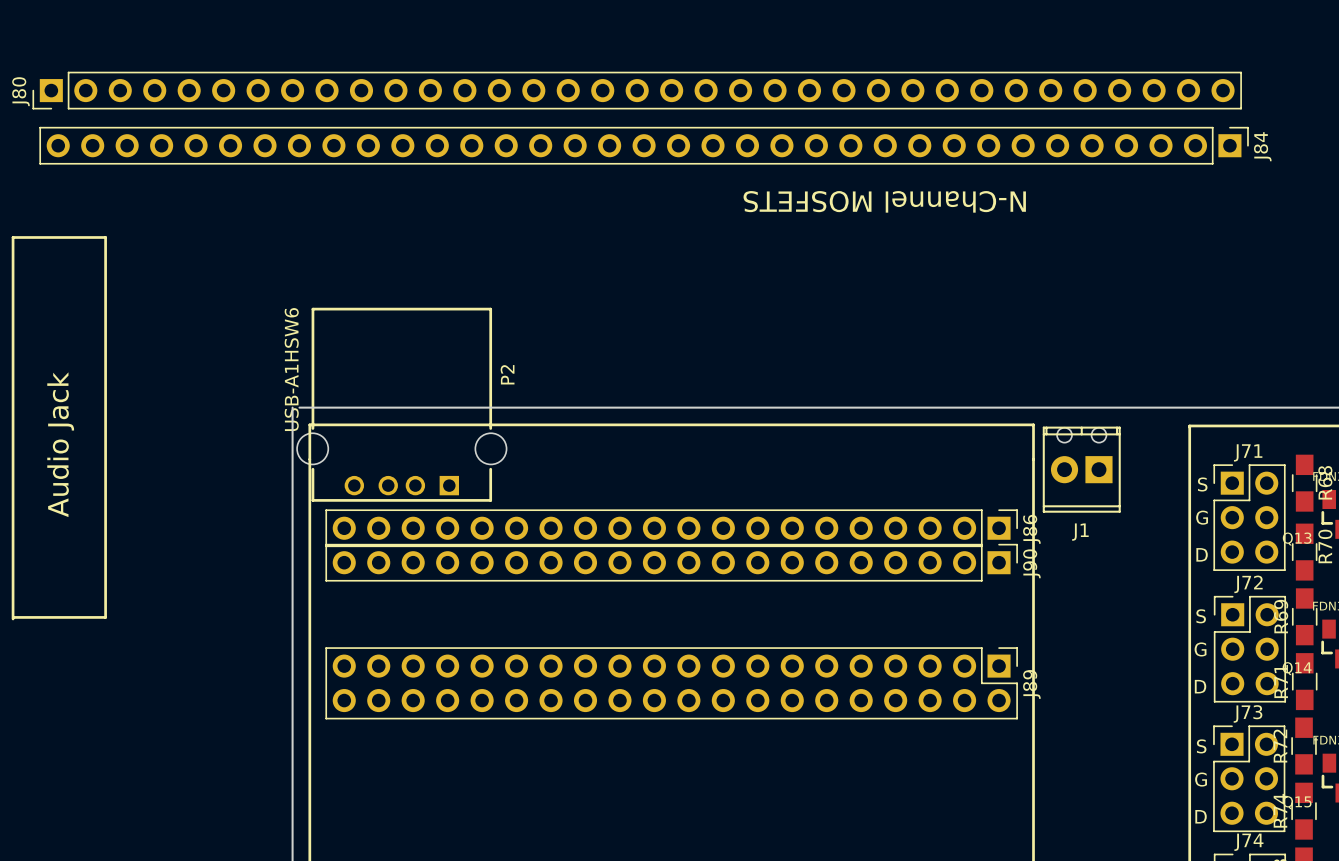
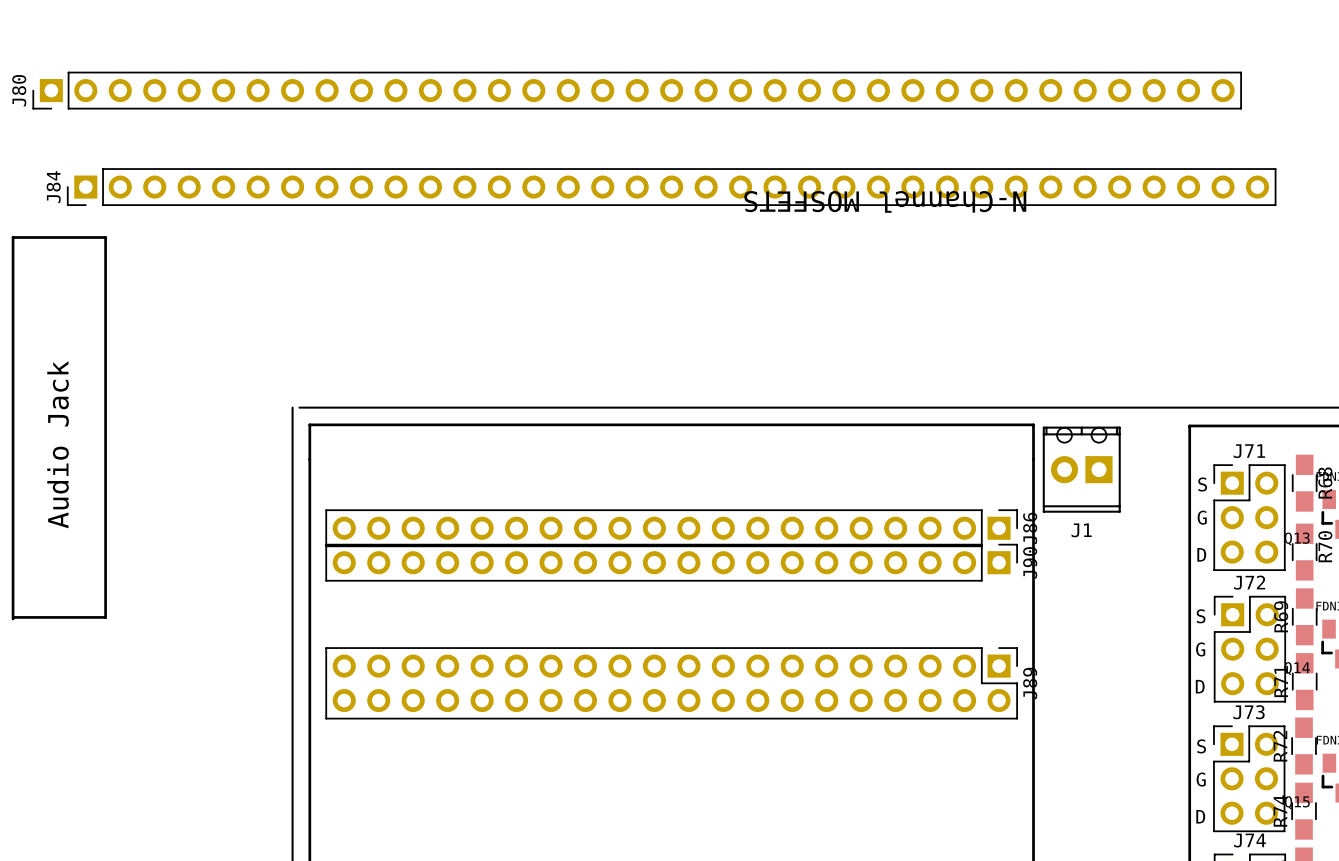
J84 rotation: 0° (644, 145) -> 180° (671, 187)
P2: USB-A1HSW6 (401, 404) -> none

